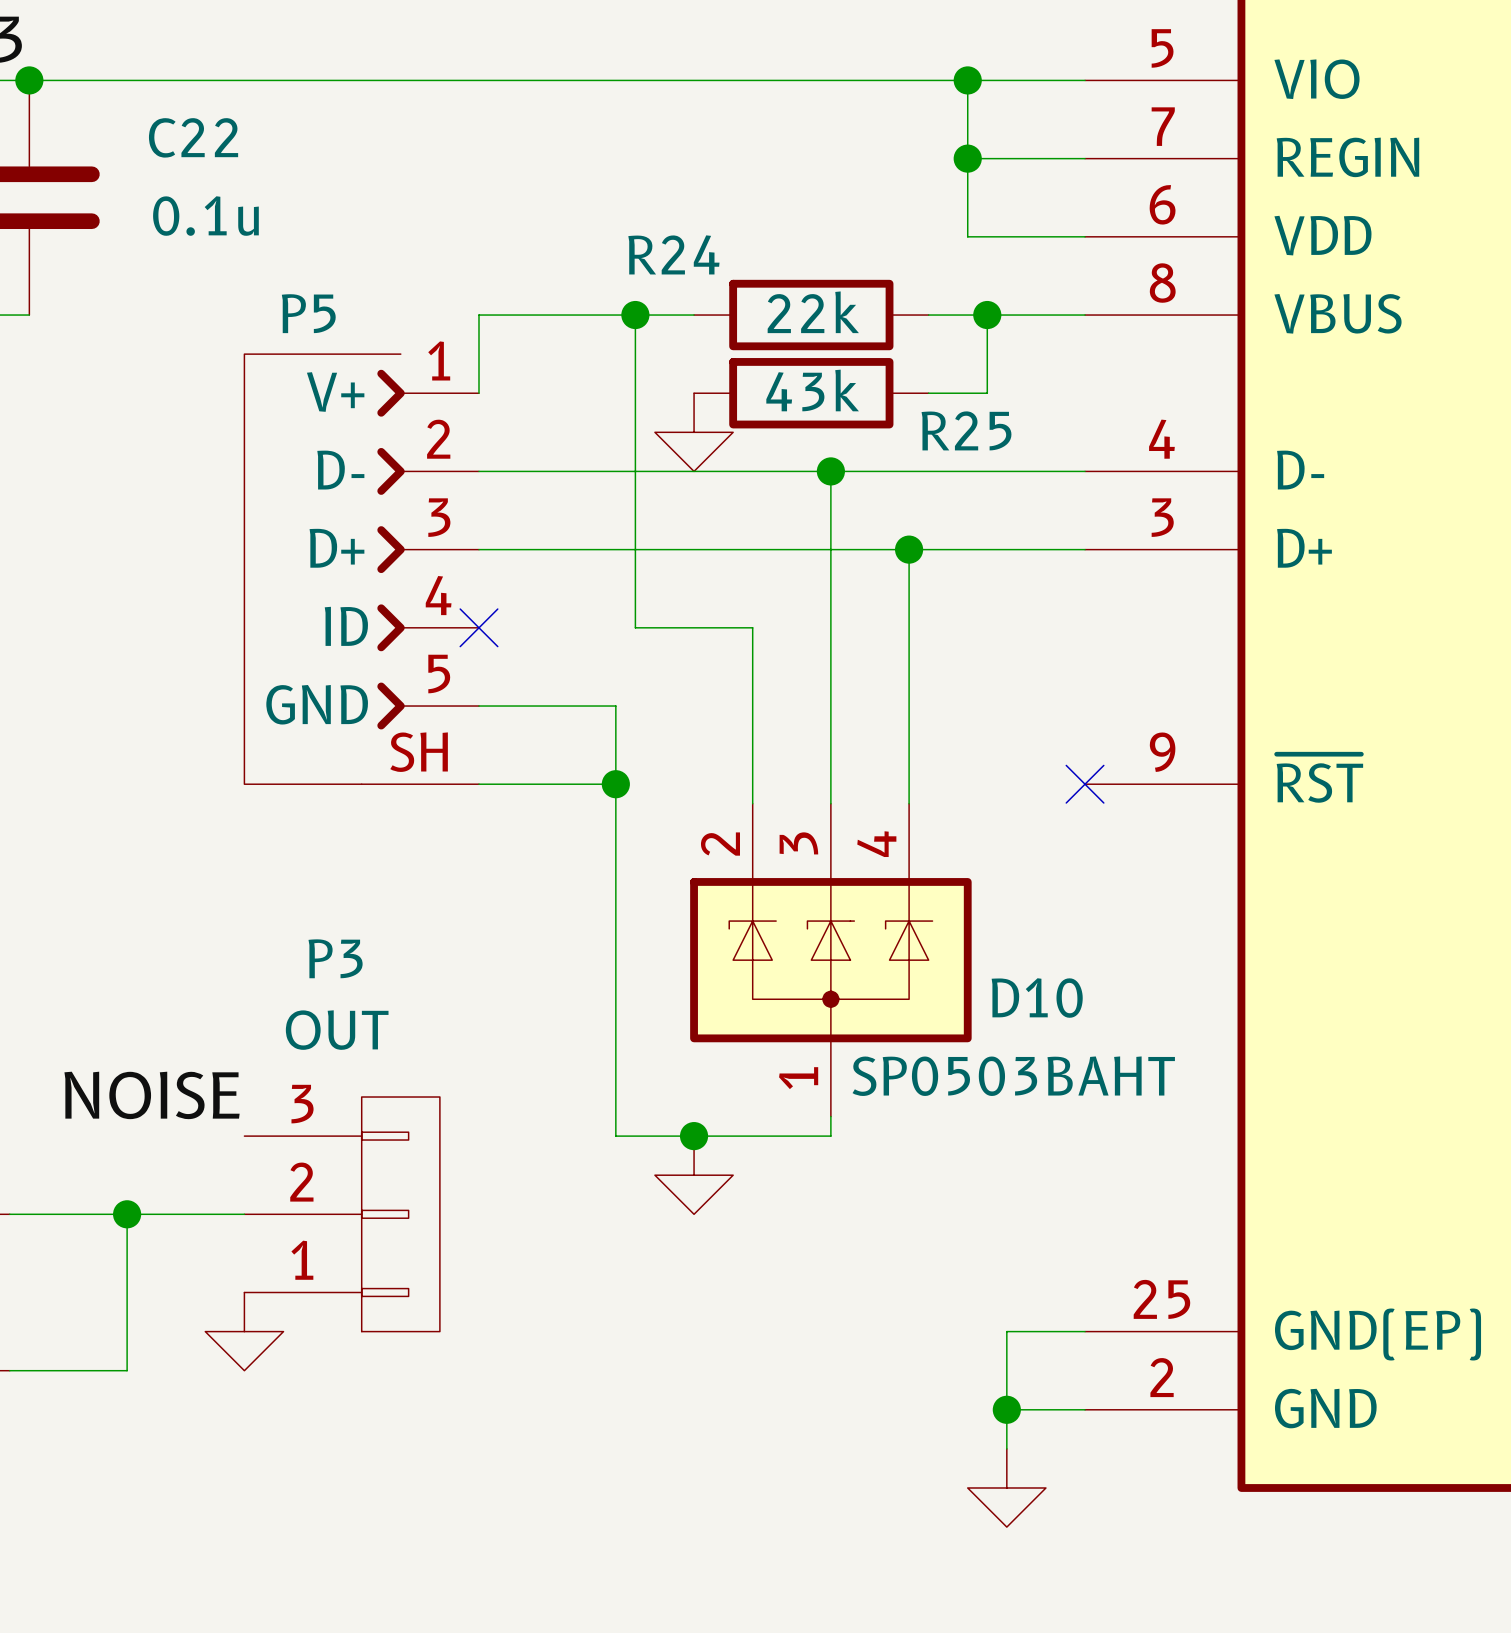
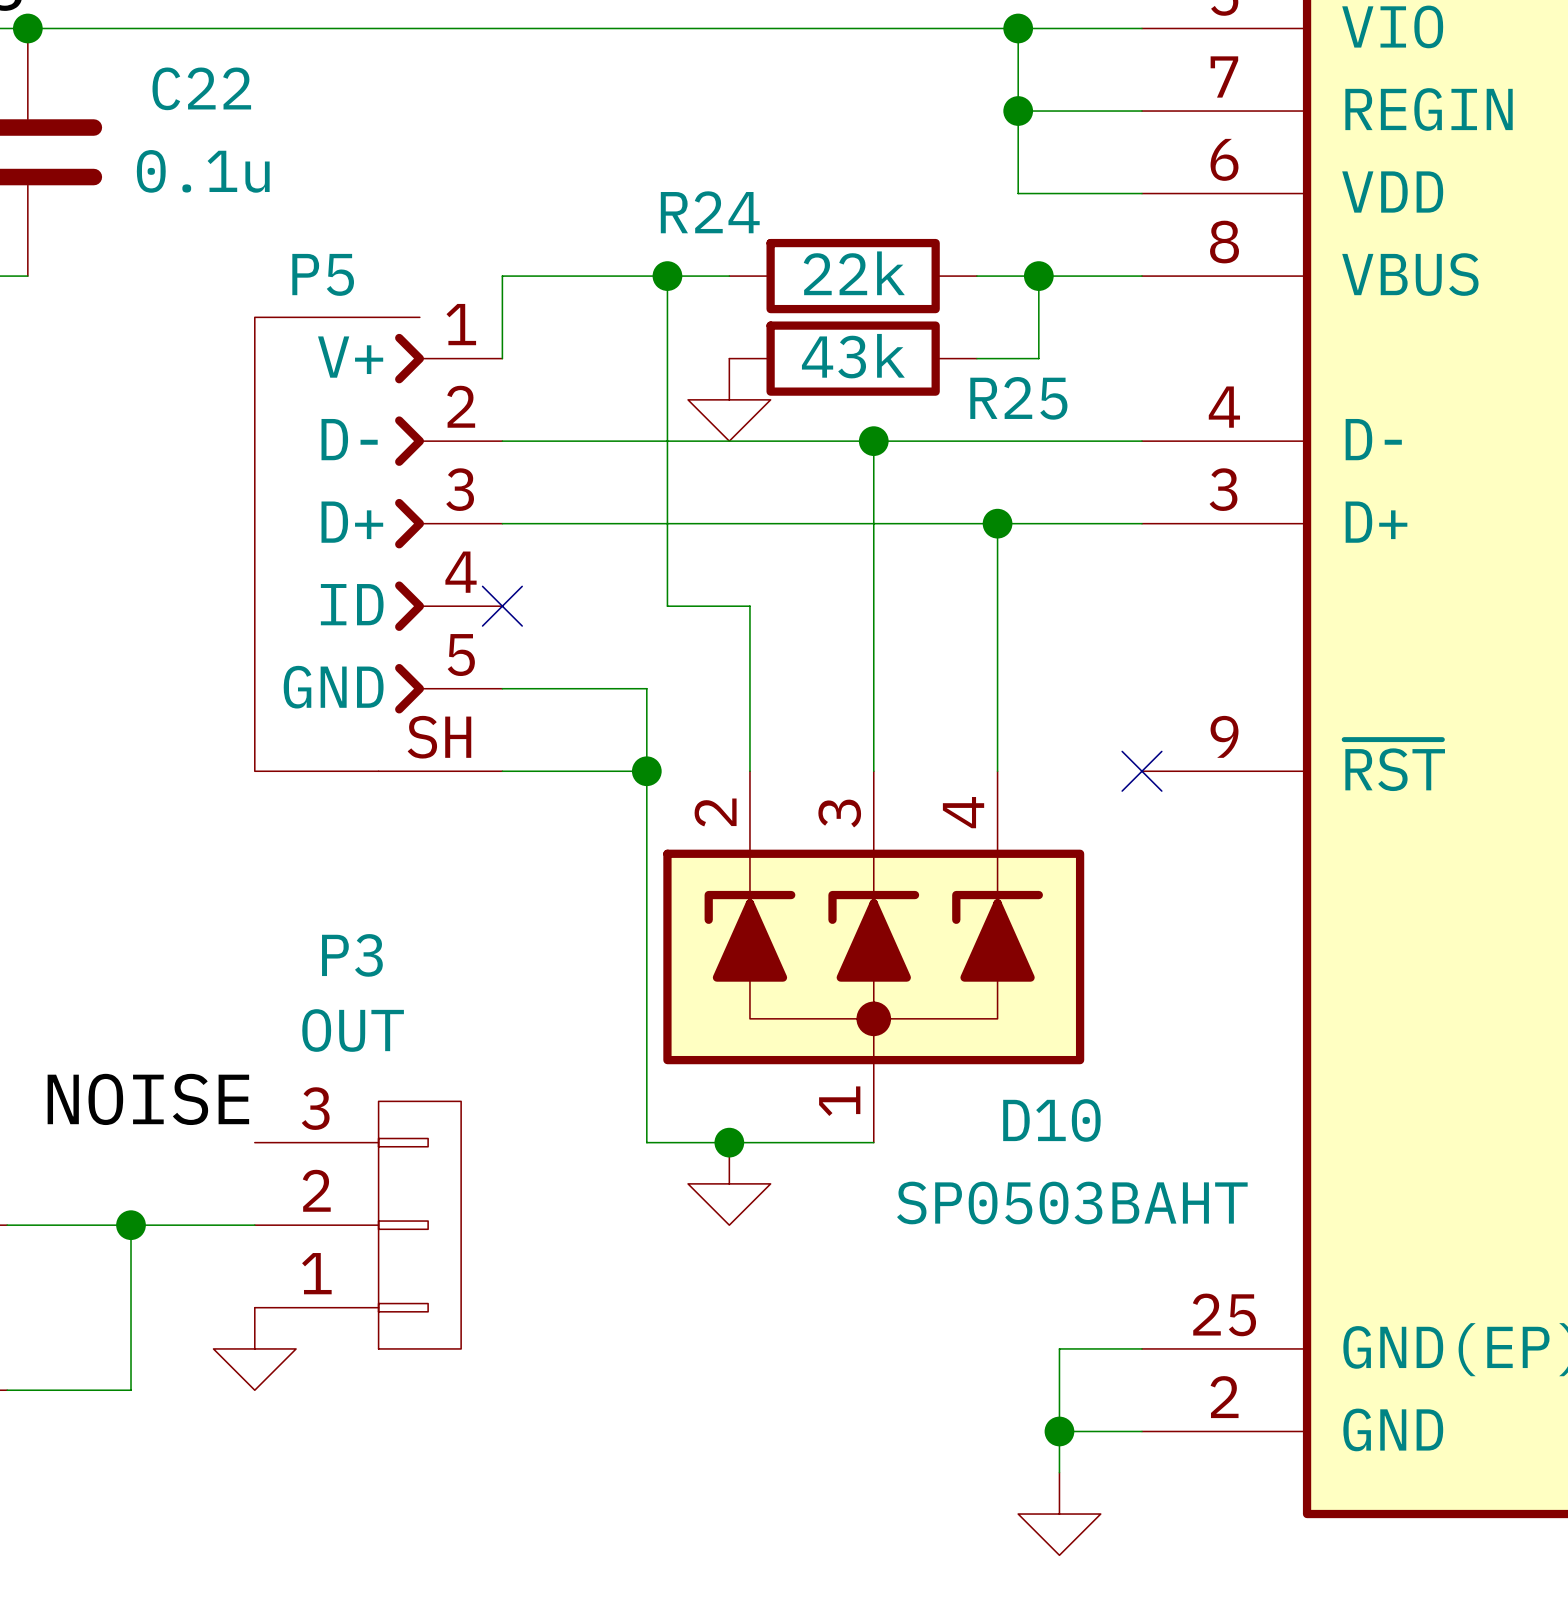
wire: (909, 549) (909, 803) -> none
junction position: (909, 549) -> (997, 523)
wire: none -> (997, 523) (997, 771)
wire: (713, 627) (752, 627) (752, 803) -> (749, 606) (749, 771)
D10 symbol: [690, 803, 972, 1117] -> [663, 771, 1085, 1143]
D10 name position: D10 (1037, 998) -> D10 (1051, 1120)
D10 value position: SP0503BAHT (1013, 1076) -> SP0503BAHT (1072, 1202)

